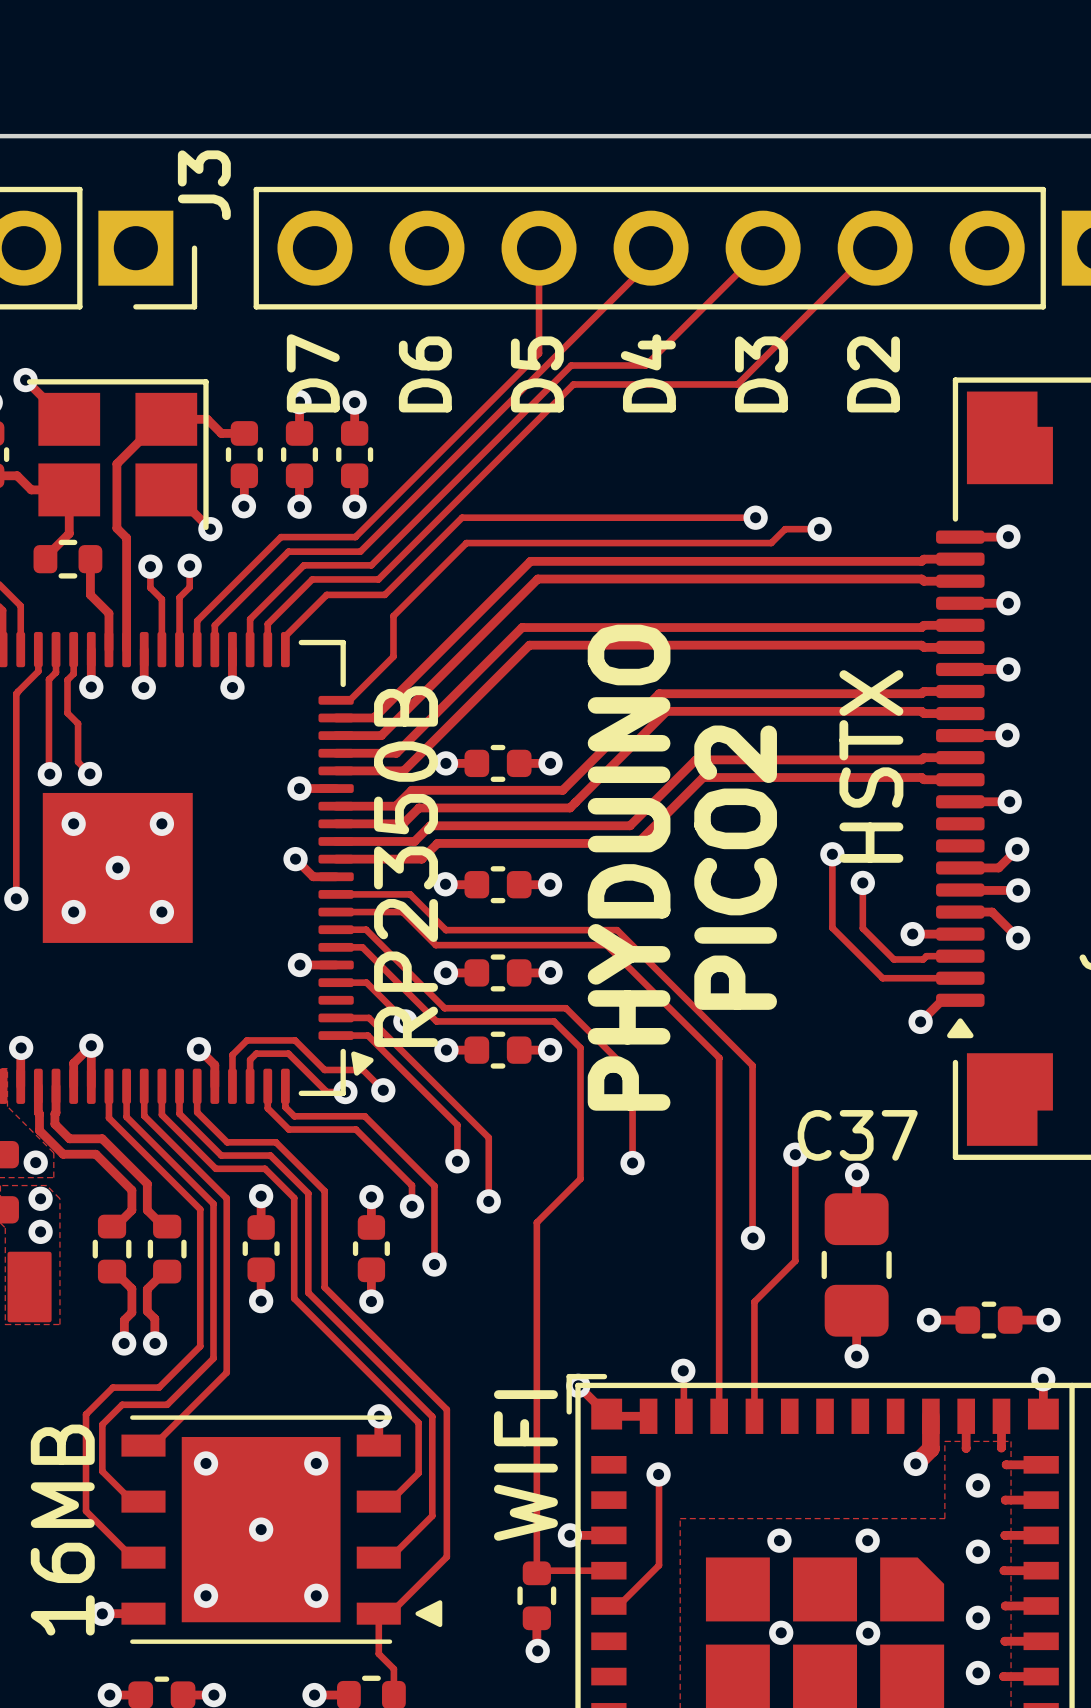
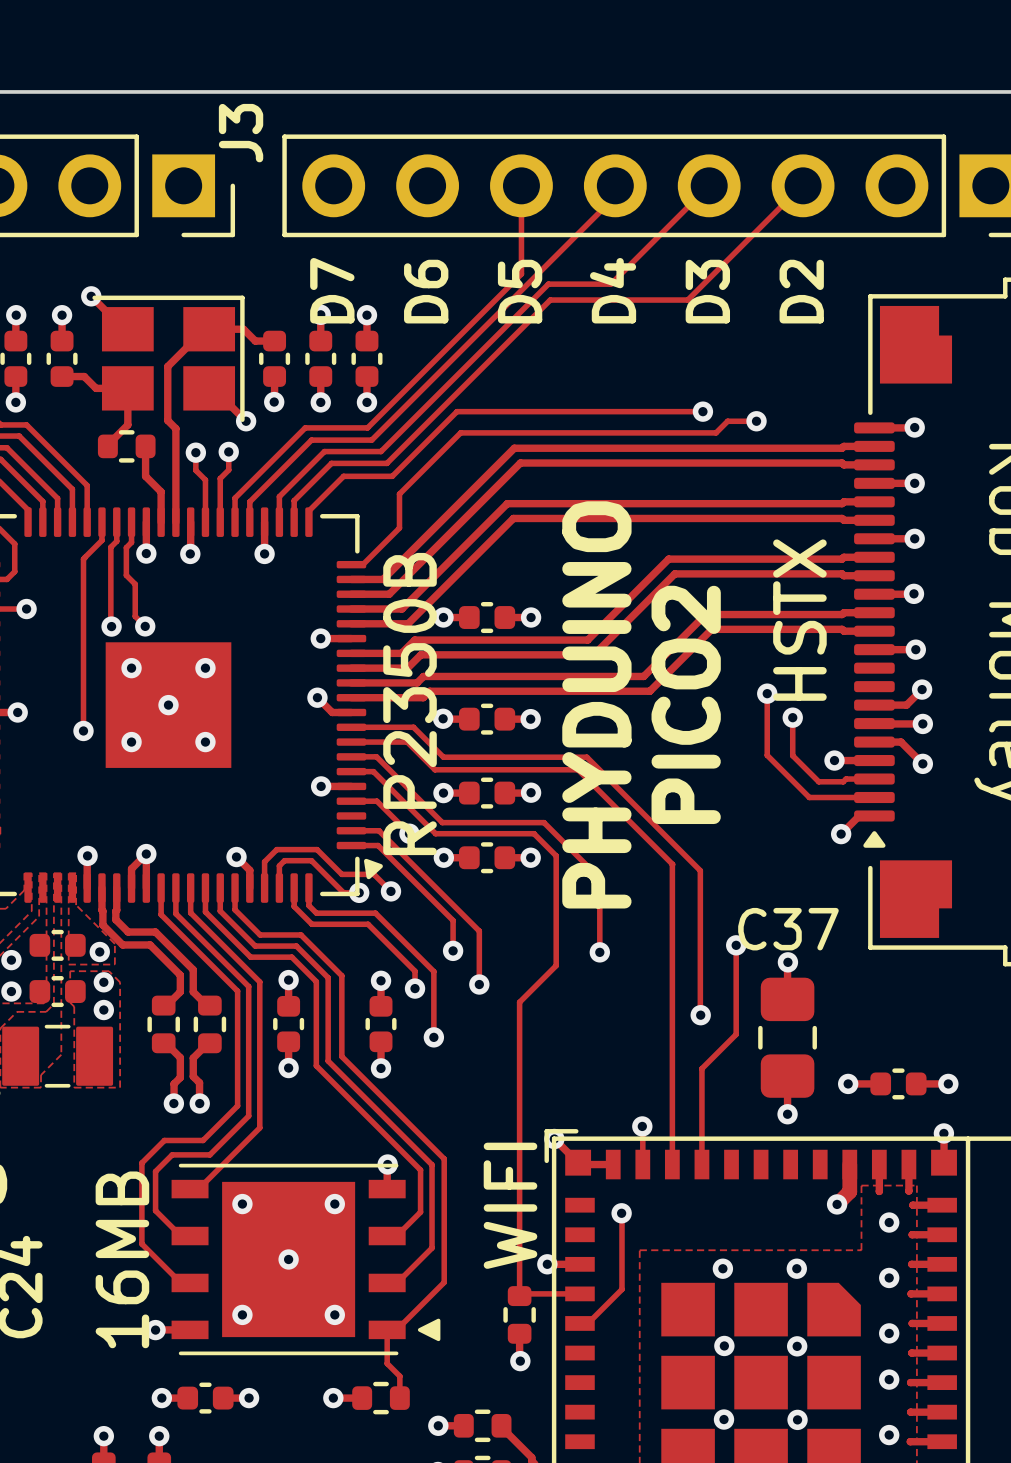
track: (714, 693) (659, 693) (562, 790) -> (668, 559) (587, 640) (541, 640)
track: (722, 711) (666, 711) (570, 807) -> (674, 573) (593, 654) (547, 654)
track: (758, 759) (695, 759) (630, 825) (430, 825) (422, 833) -> (705, 614) (643, 676) (423, 676)
track: (766, 777) (703, 777) (637, 843) (437, 843) (429, 851) -> (711, 629) (649, 691) (429, 691)

